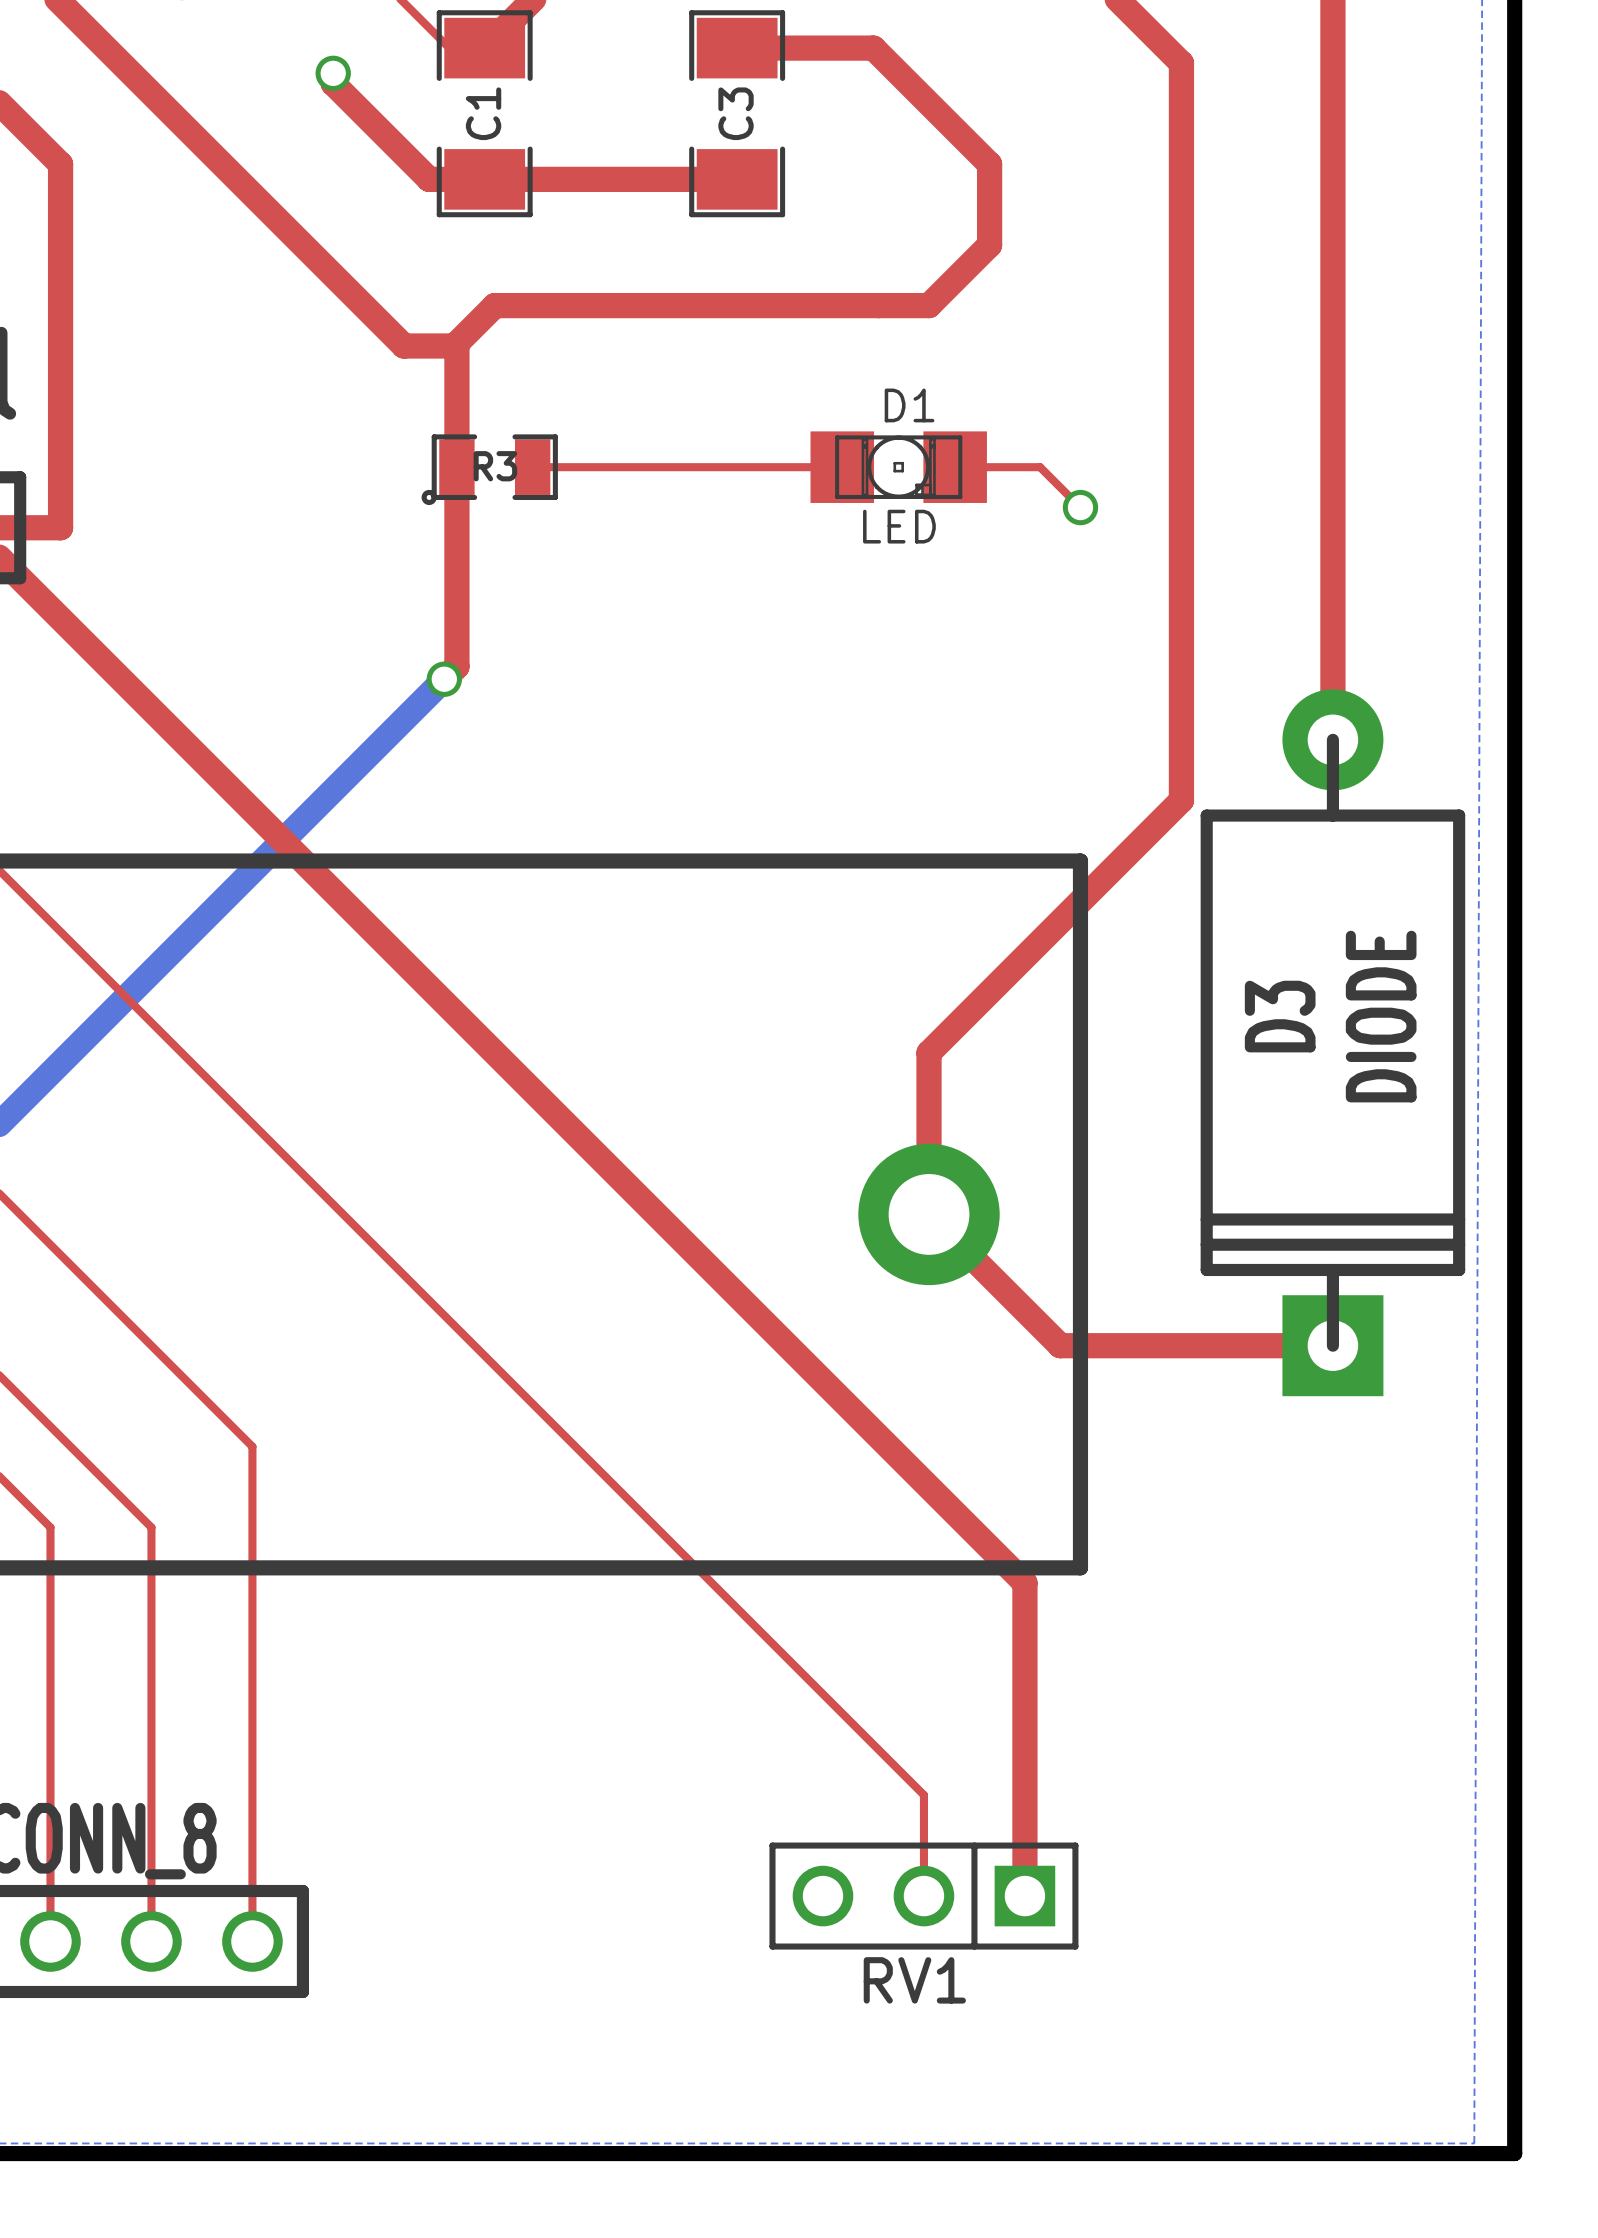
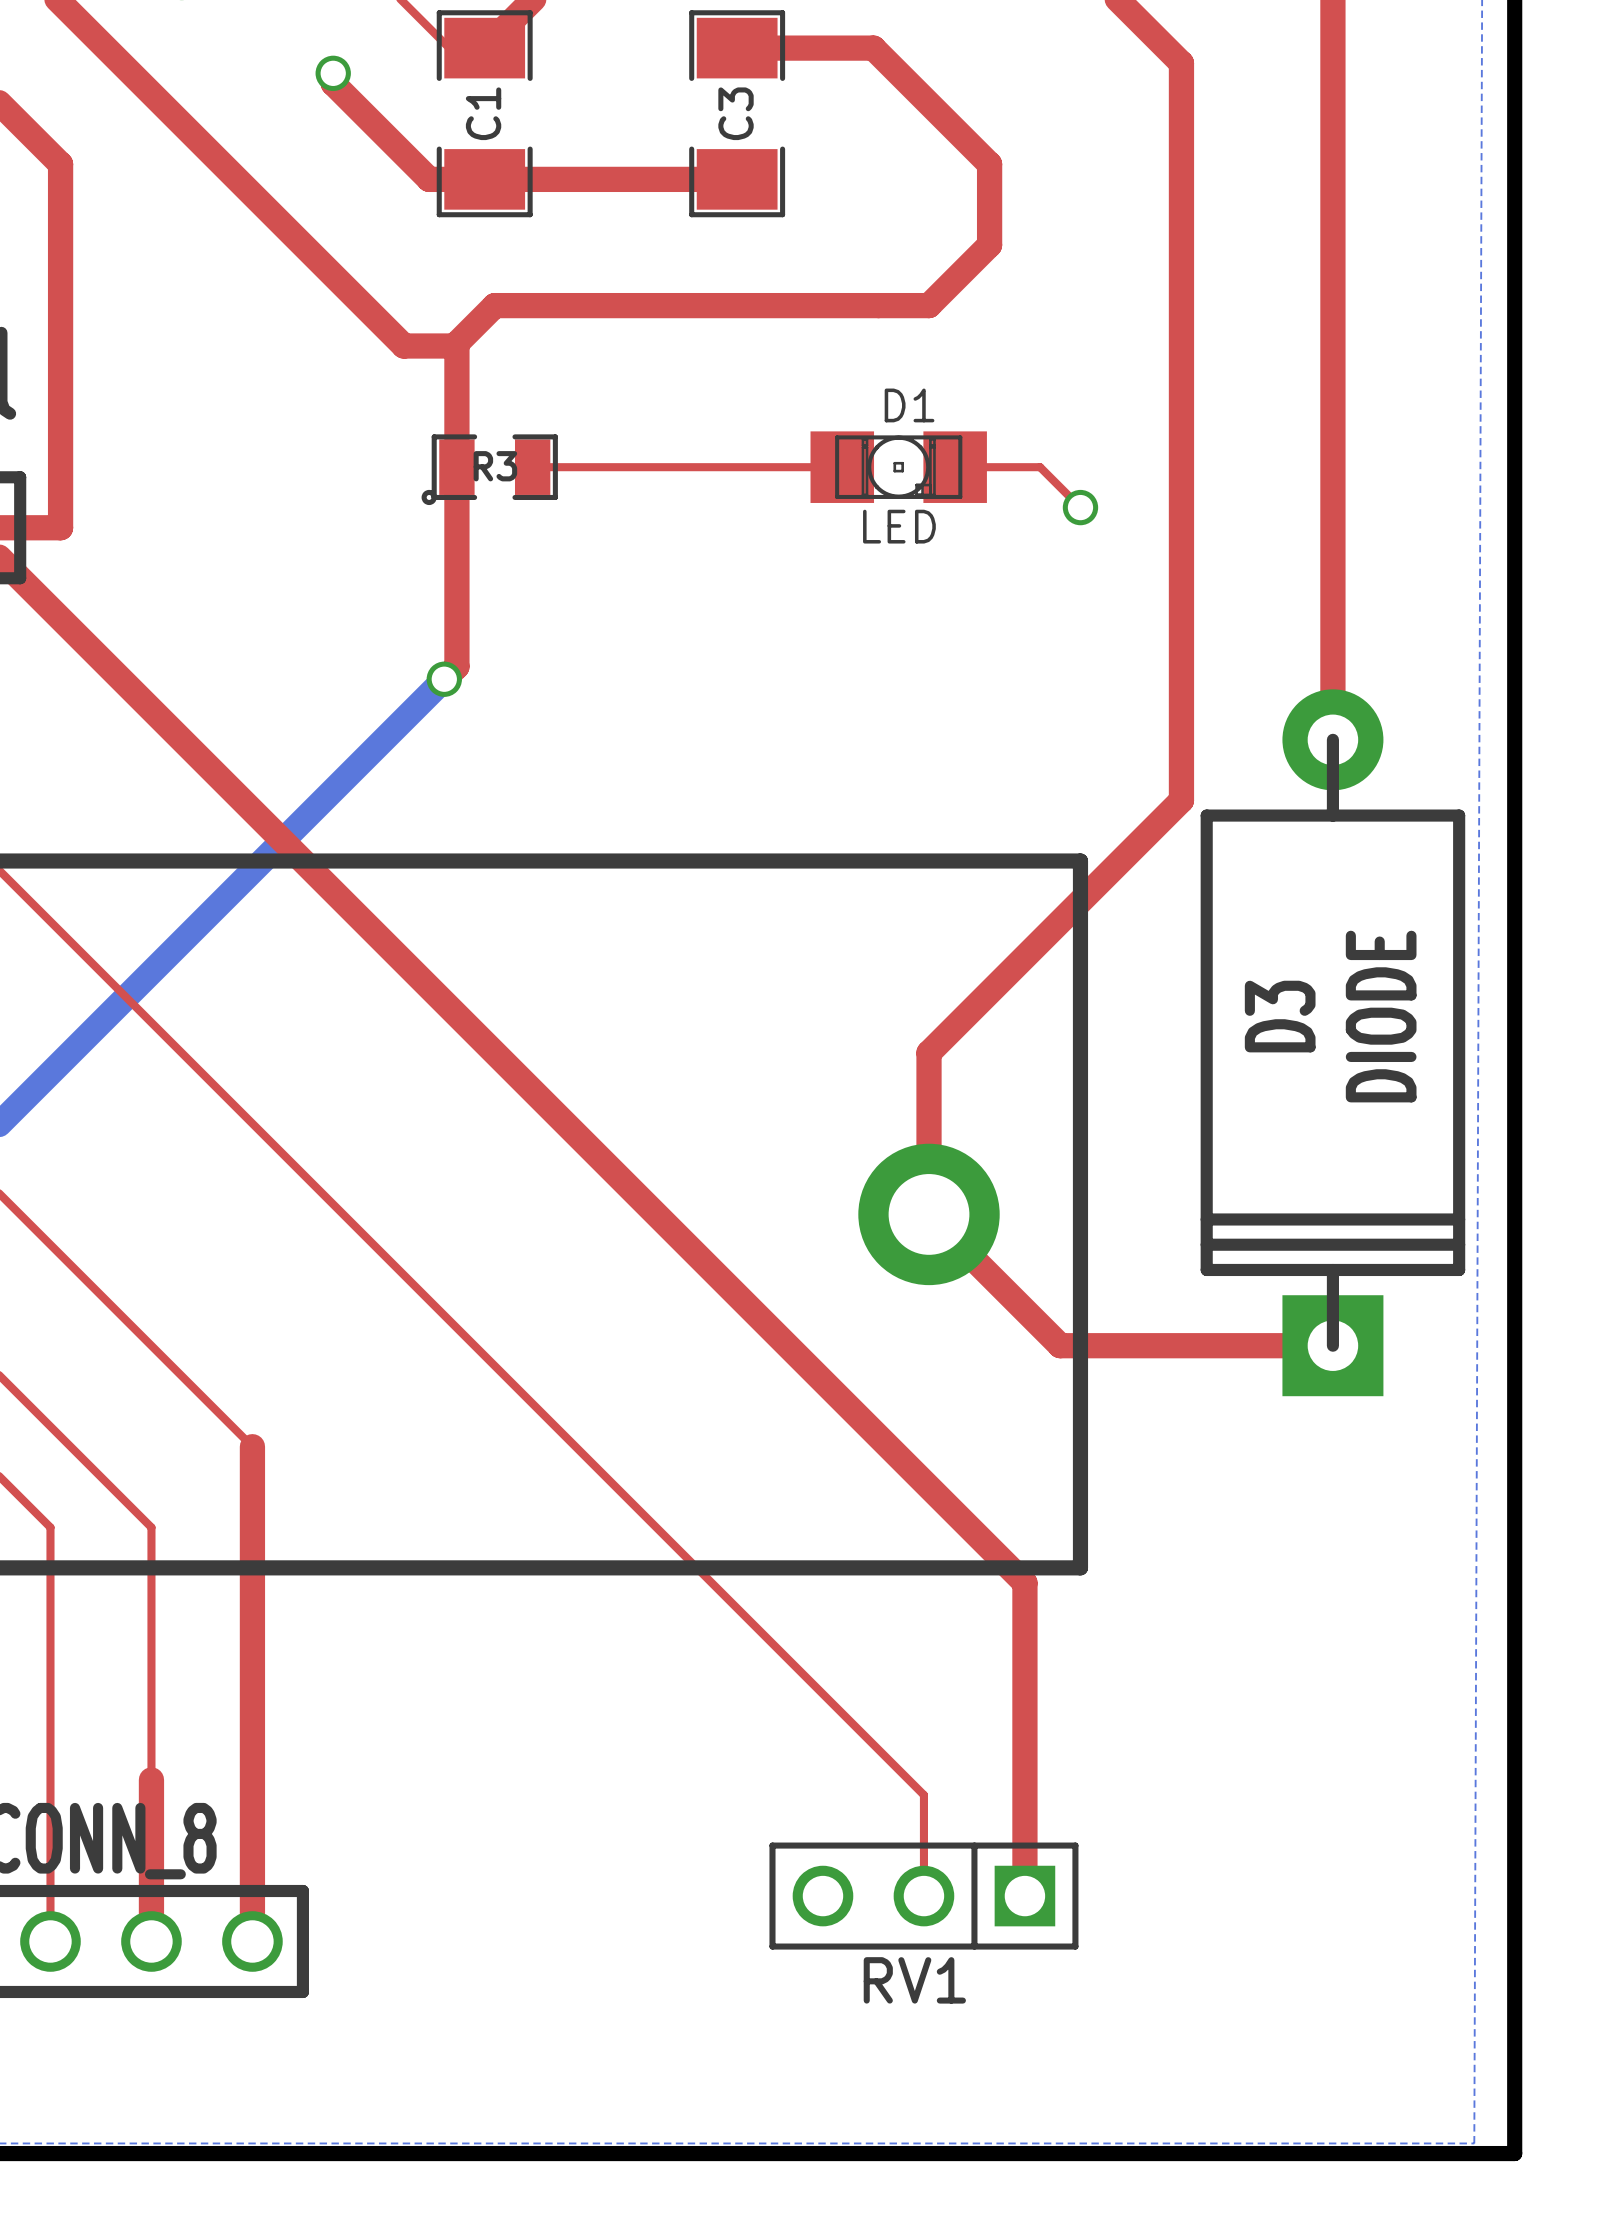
top track width: thin (252, 1446) (252, 1941) -> thick (252, 1446) (252, 1941)
top track width: thin (151, 1779) (151, 1941) -> thick (151, 1779) (151, 1941)

